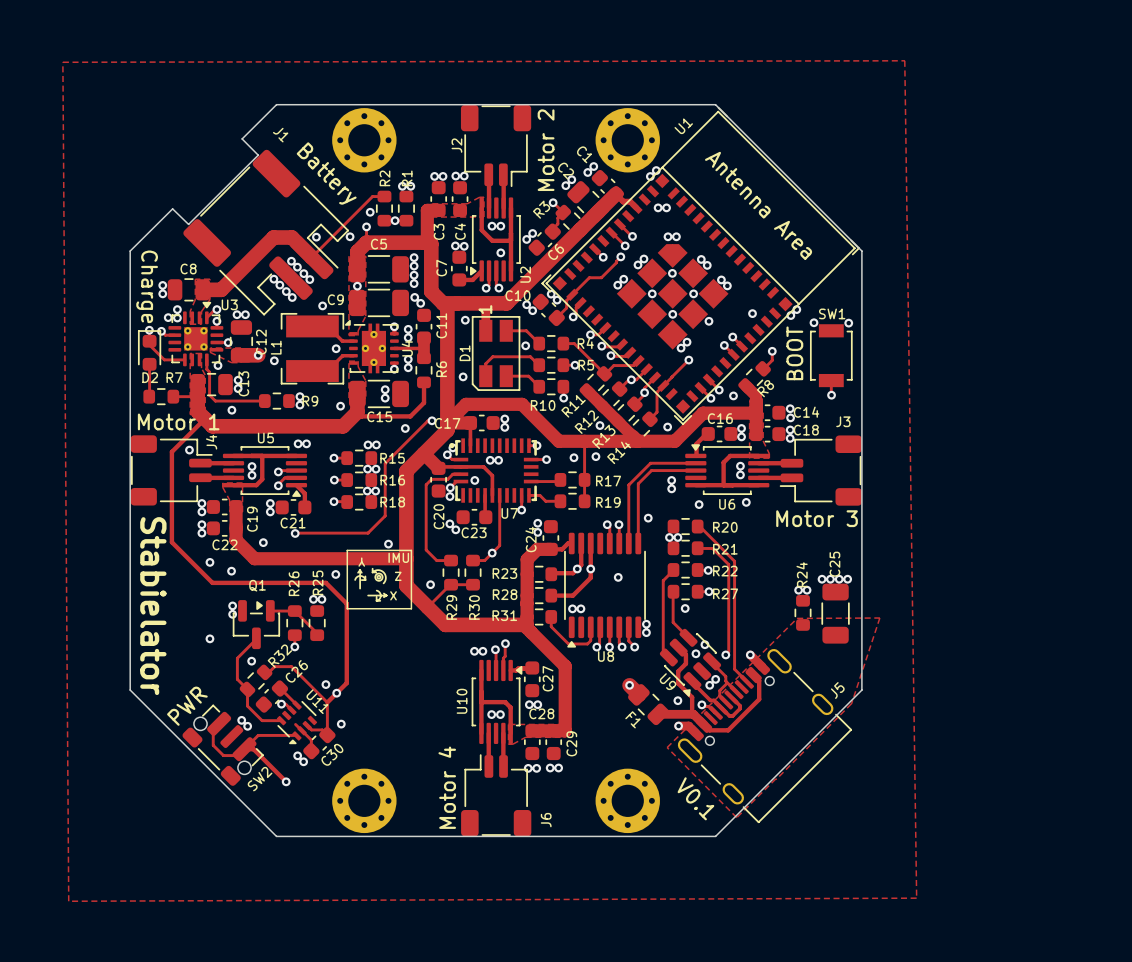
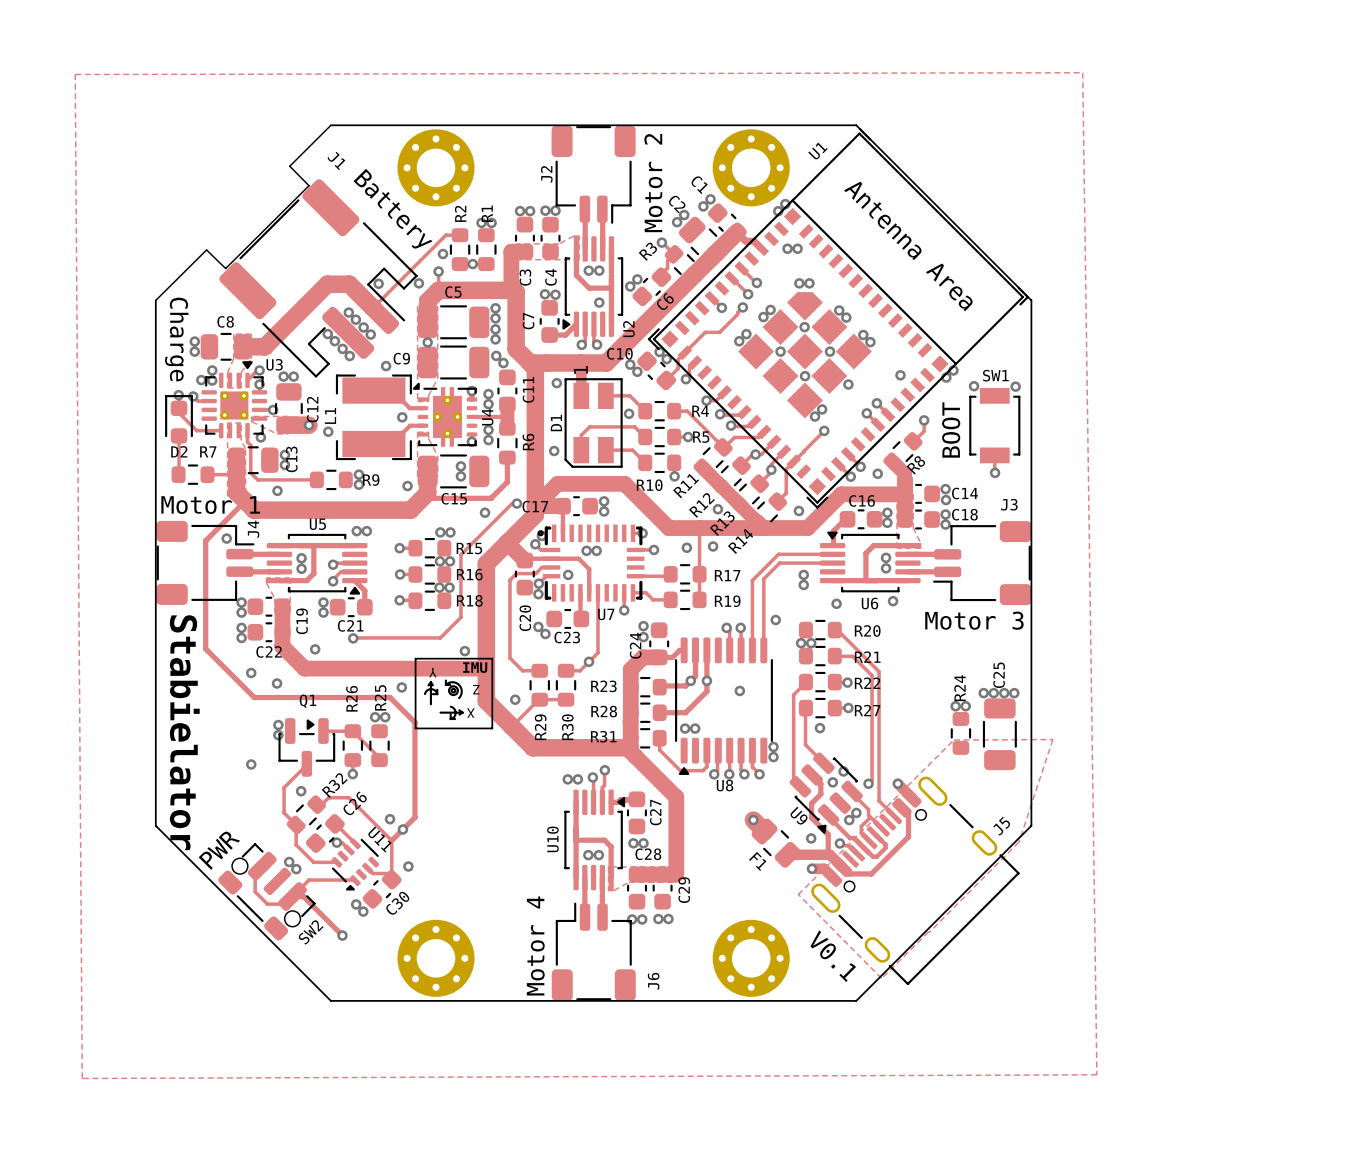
track: (295, 724) (301, 730) -> none
track: (302, 730) (311, 740) (311, 751) -> none

